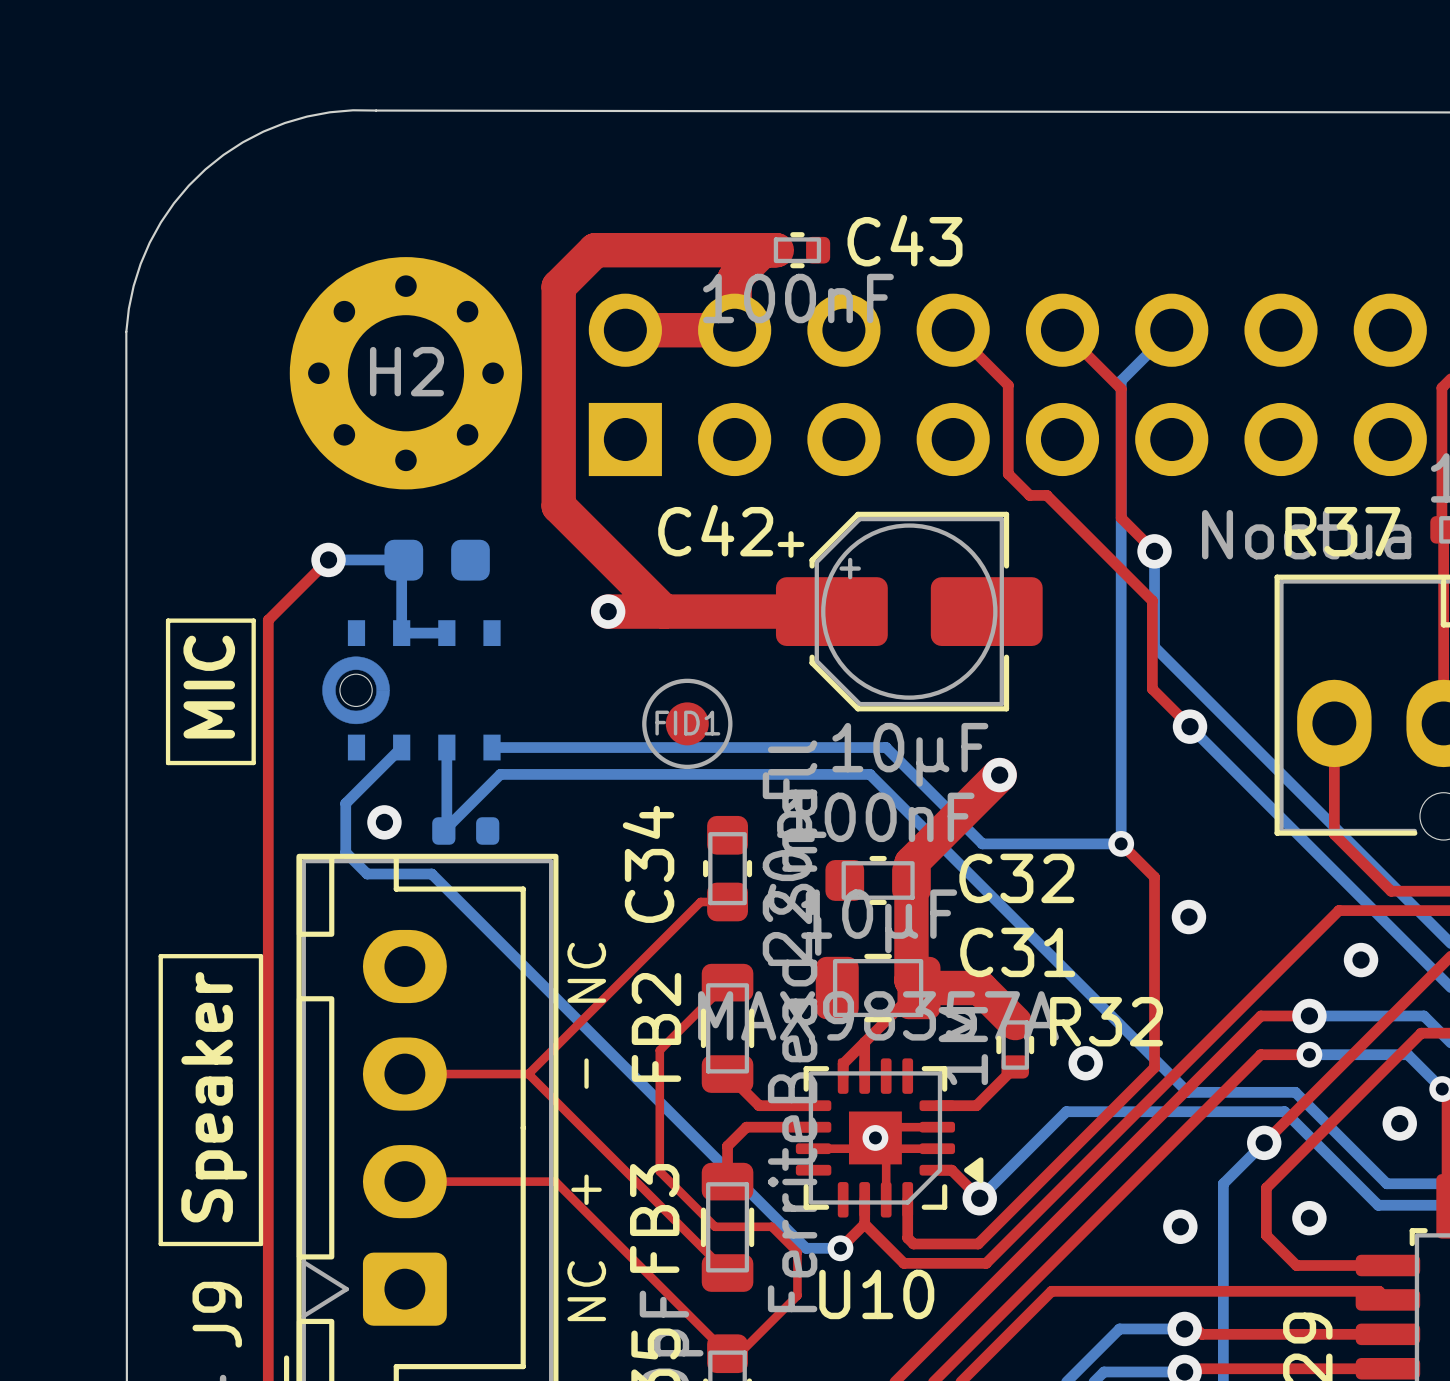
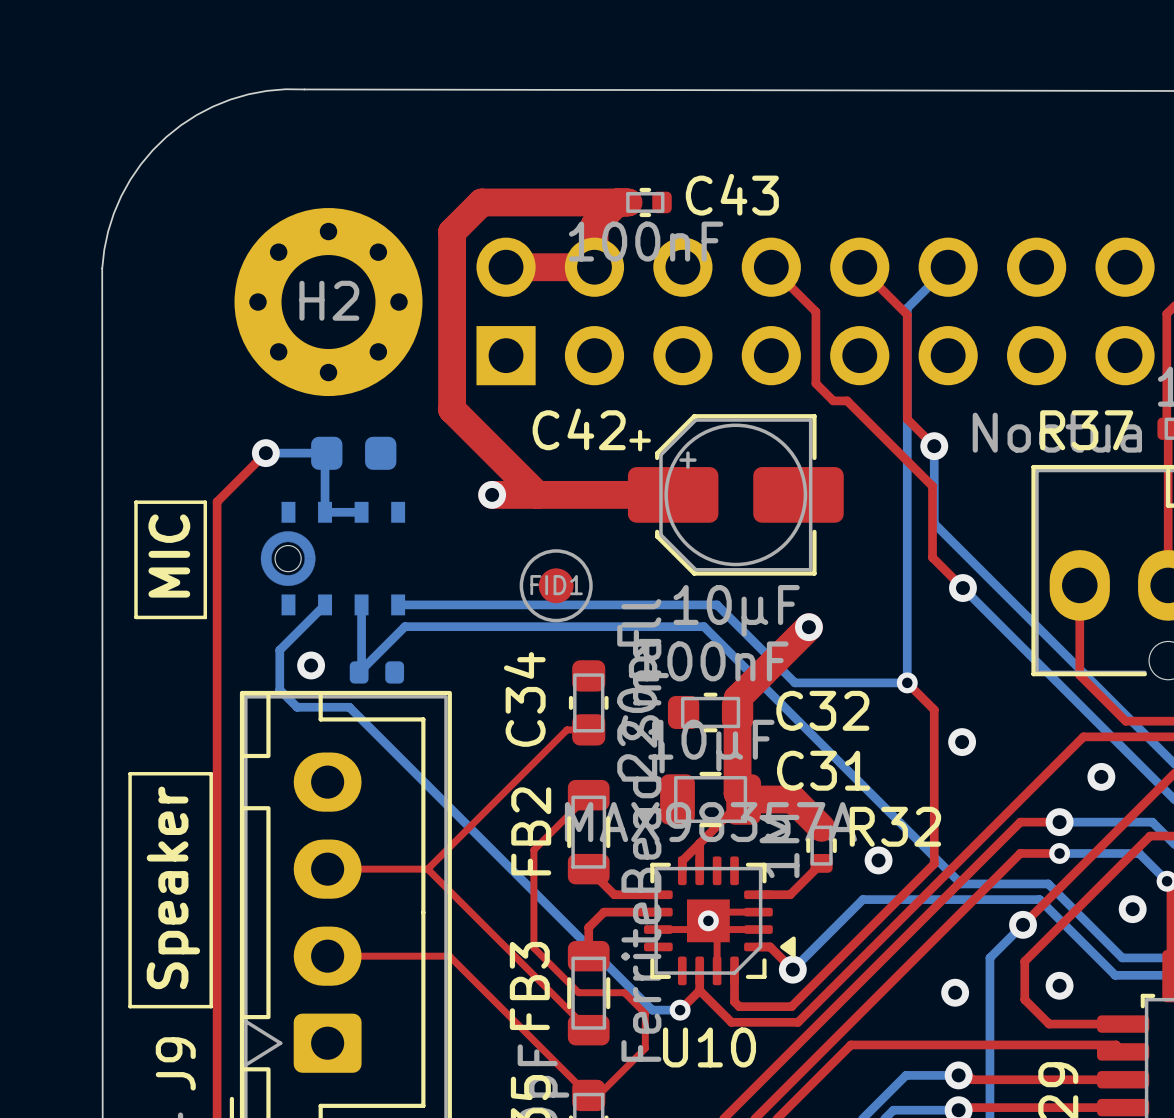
text: NC (586, 972) -> none
text: - (586, 1073) -> none
text: + (586, 1189) -> none
text: NC (586, 1291) -> none

